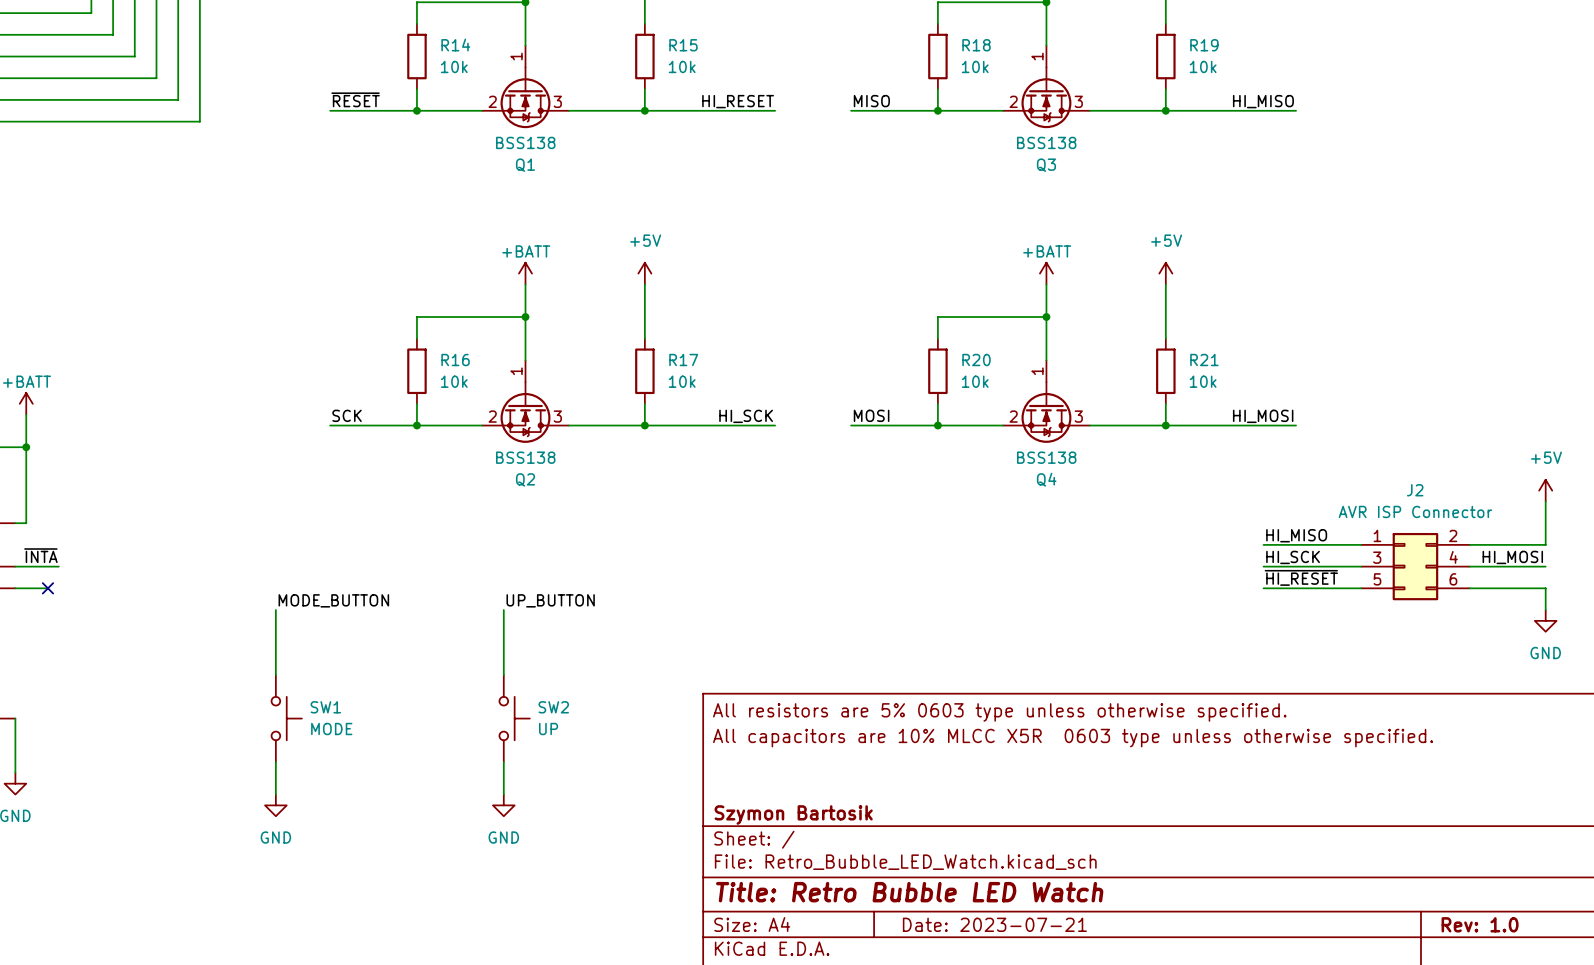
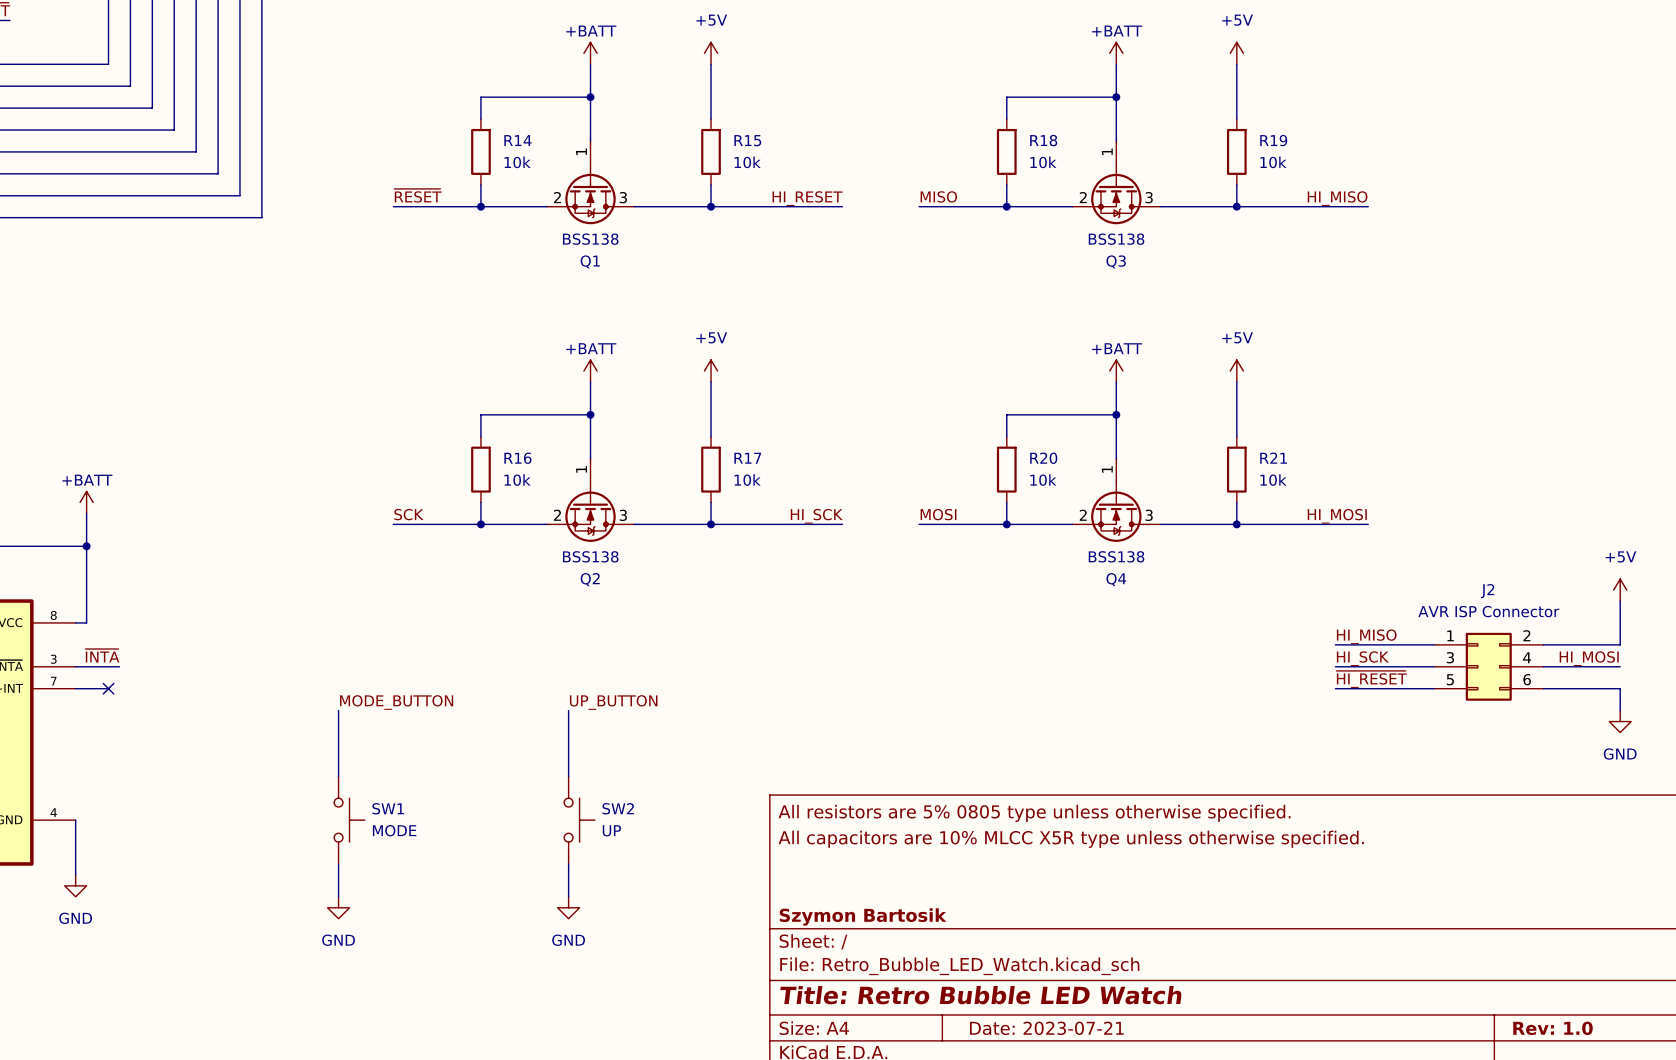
title block: All resistors are 5% 0603 type unless otherwise specified. (999, 712) -> All resistors are 5% 0805 type unless otherwise specified. (1034, 813)
title block: All capacitors are 10% MLCC X5R 0603 type unless otherwise specified. (1073, 738) -> All capacitors are 10% MLCC X5R type unless otherwise specified. (1071, 839)

